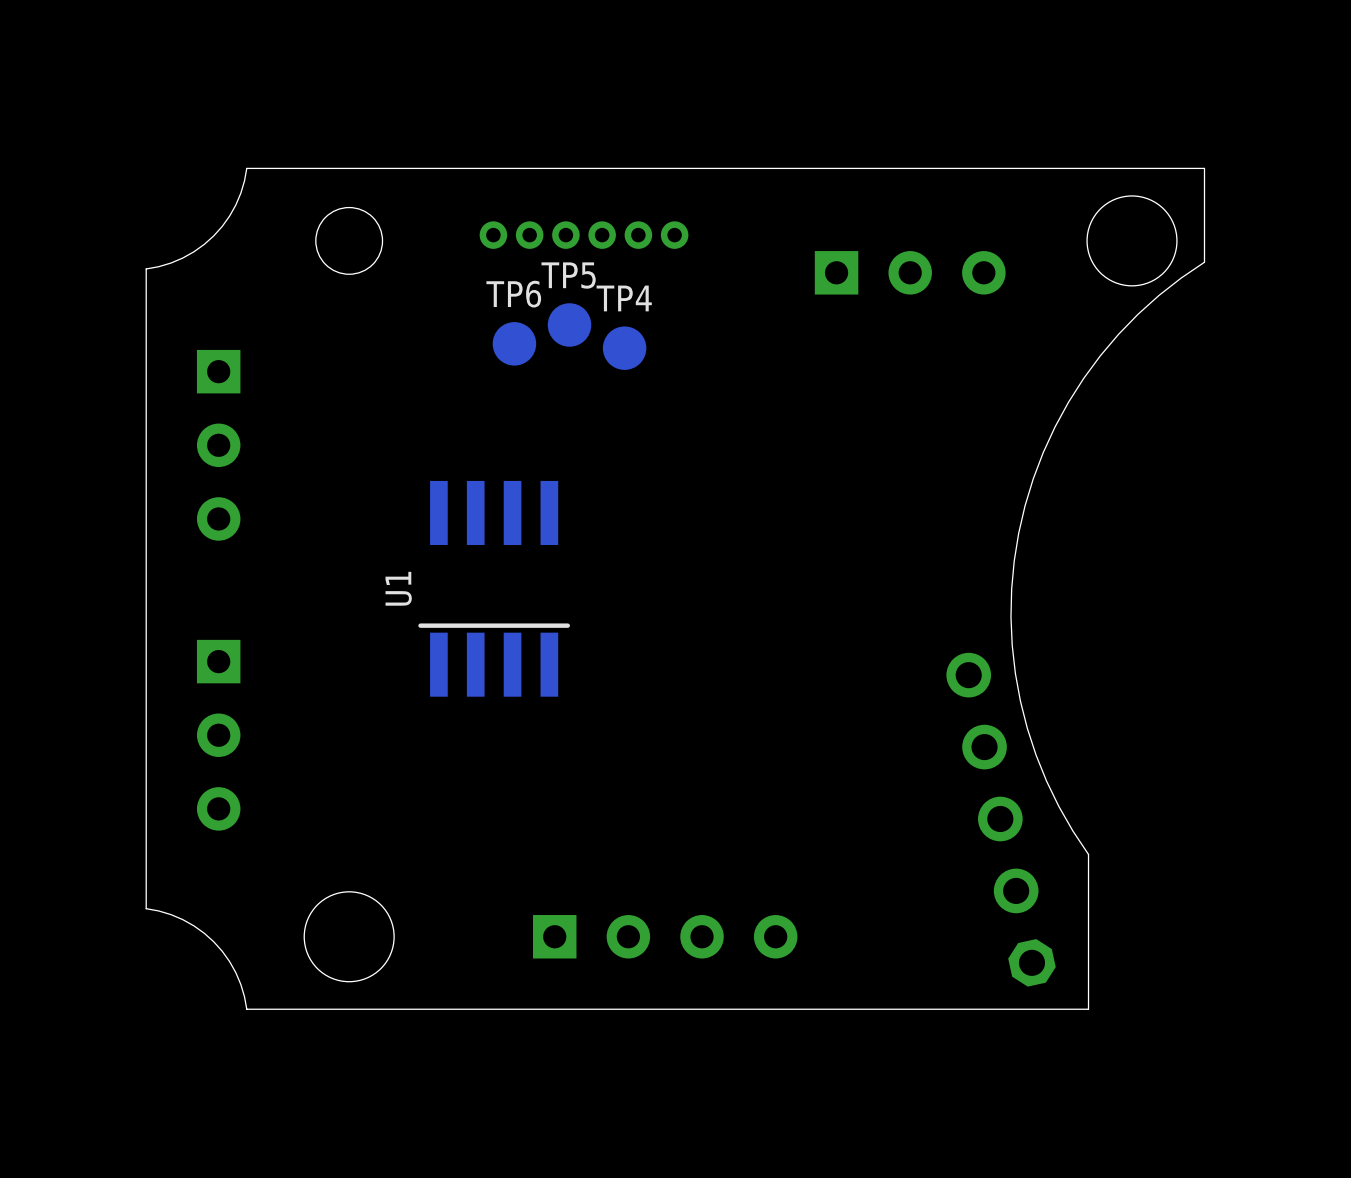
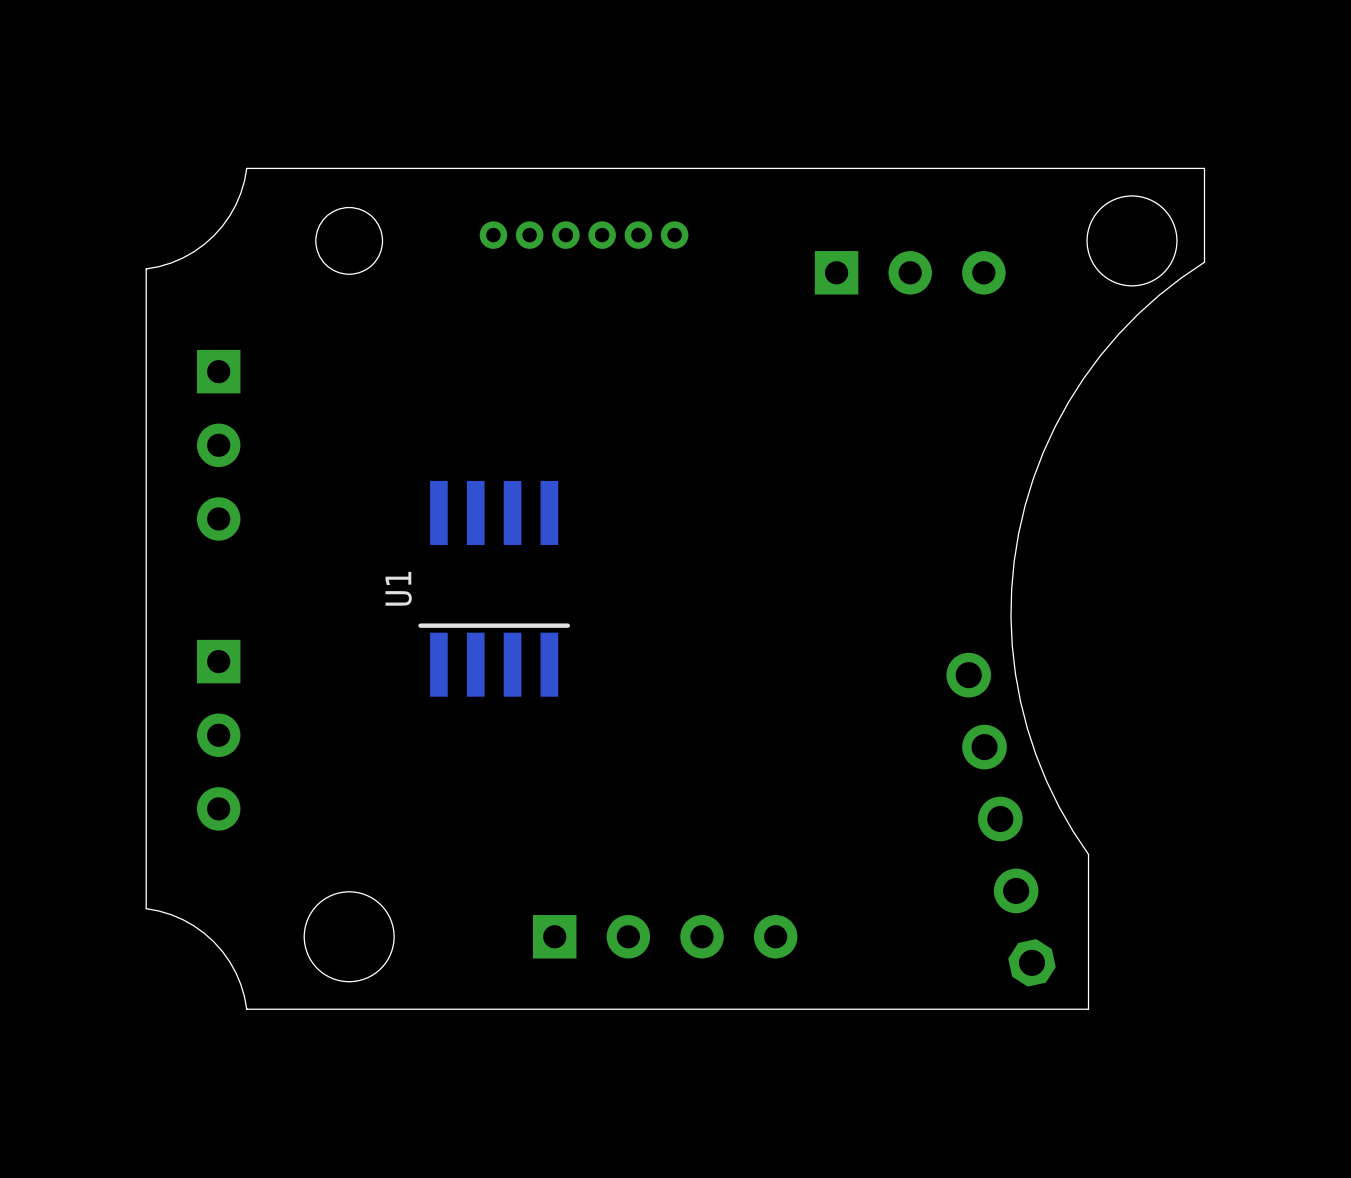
TP5: (569, 324) -> none
TP6: (514, 343) -> none
TP4: (624, 348) -> none

